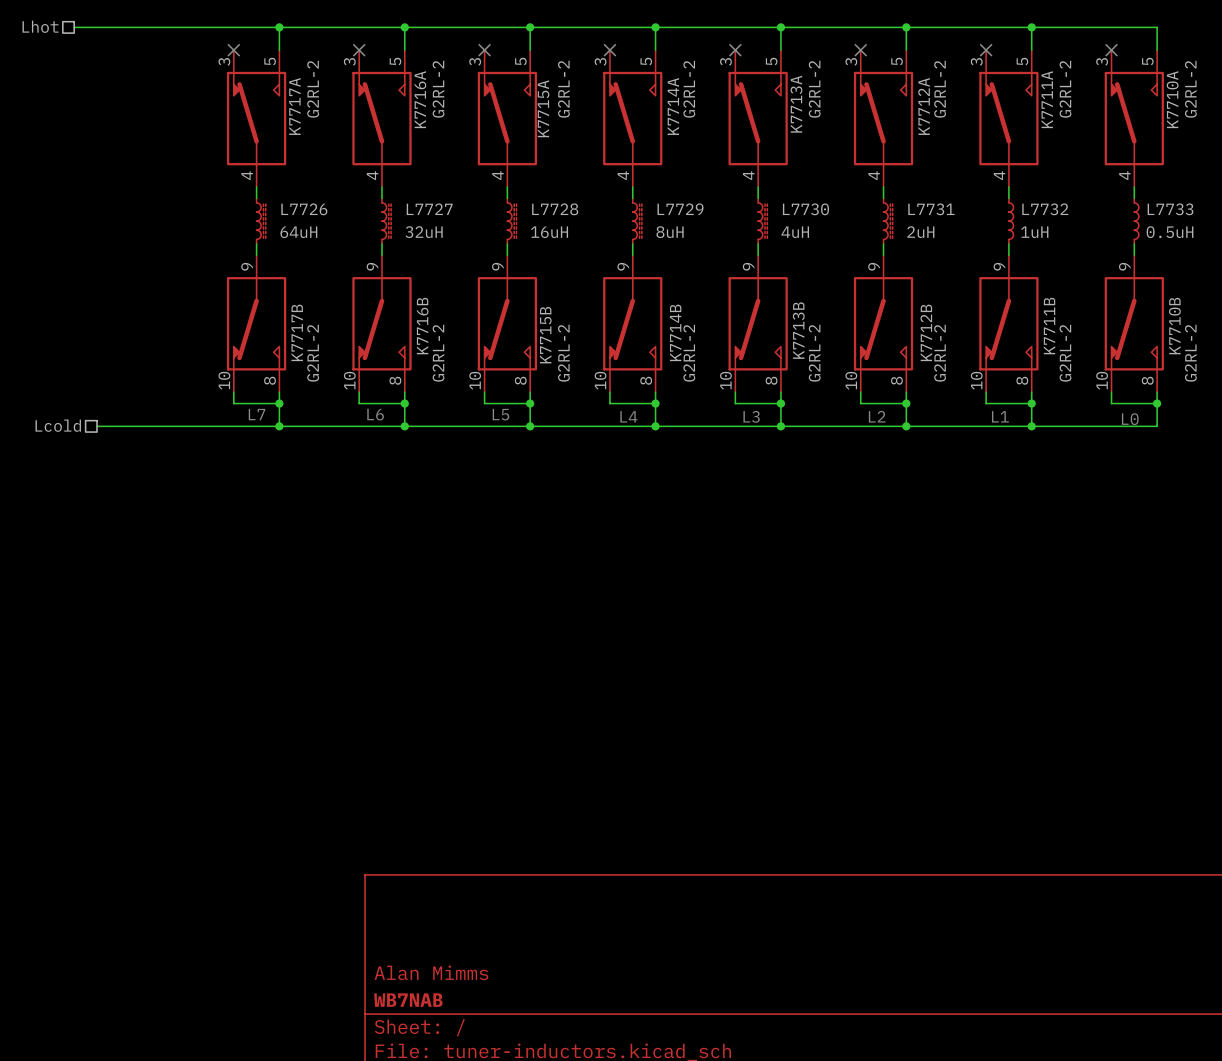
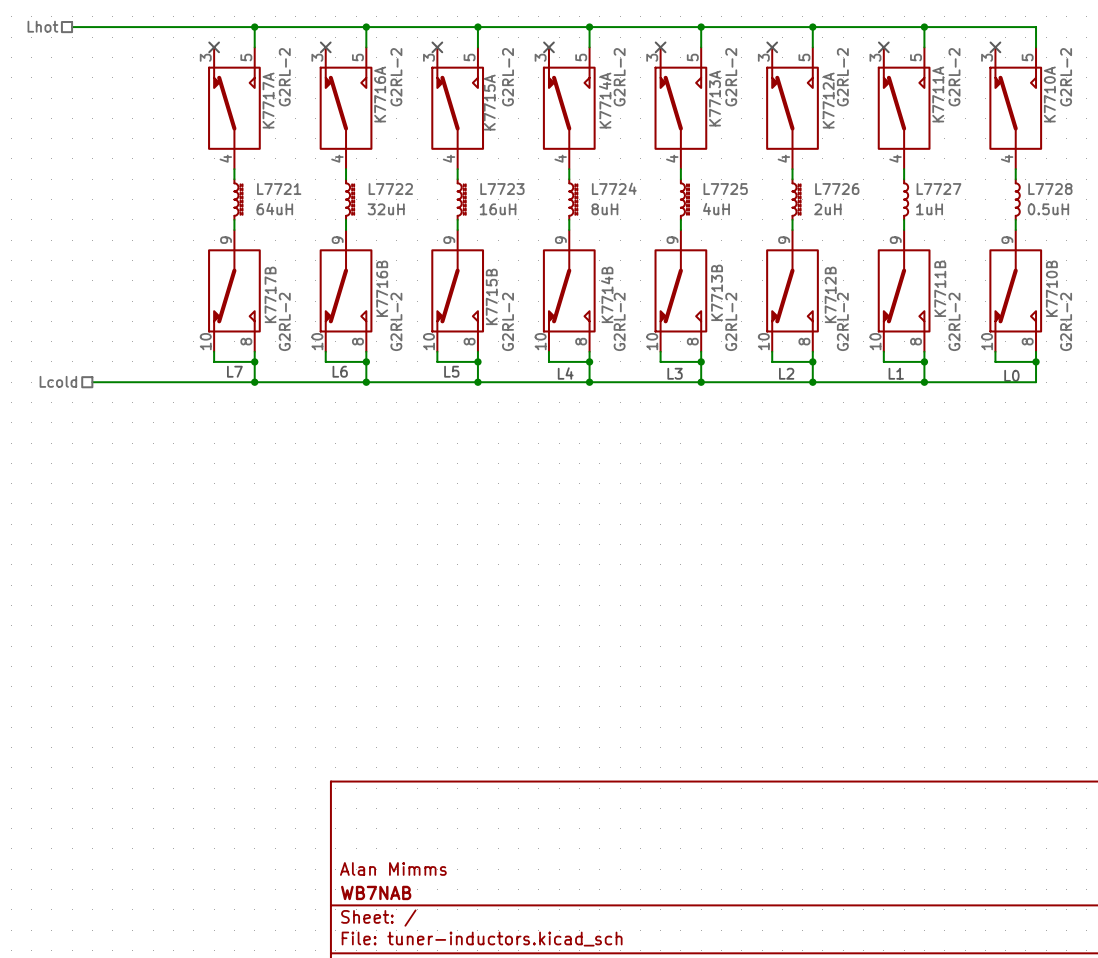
L7726 name: L7726 (304, 209) -> L7721 (279, 189)
L7727 name: L7727 (429, 209) -> L7722 (390, 189)
L7728 name: L7728 (555, 209) -> L7723 (502, 189)
L7729 name: L7729 (680, 209) -> L7724 (614, 188)
L7730 name: L7730 (805, 209) -> L7725 (725, 189)
L7731 name: L7731 (931, 209) -> L7726 (837, 189)
L7732 name: L7732 (1045, 209) -> L7727 (938, 189)
L7733 name: L7733 (1170, 209) -> L7728 (1050, 189)

